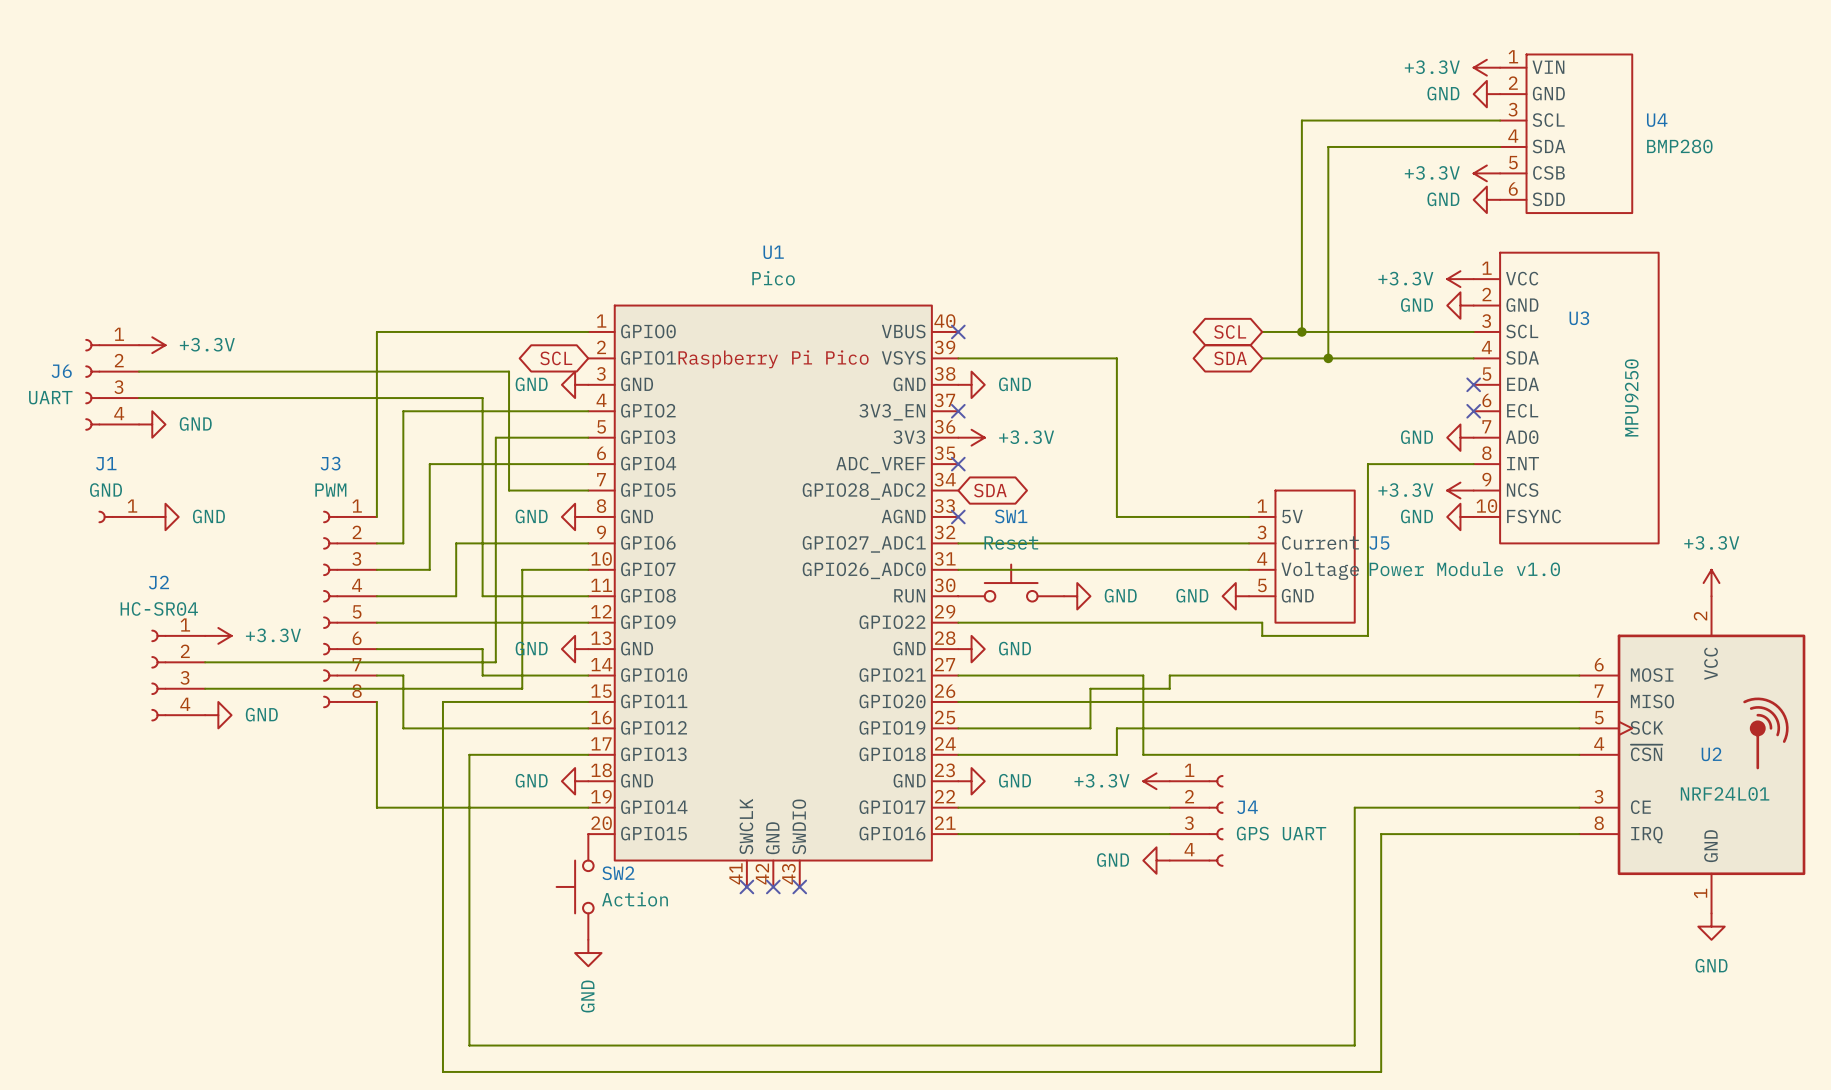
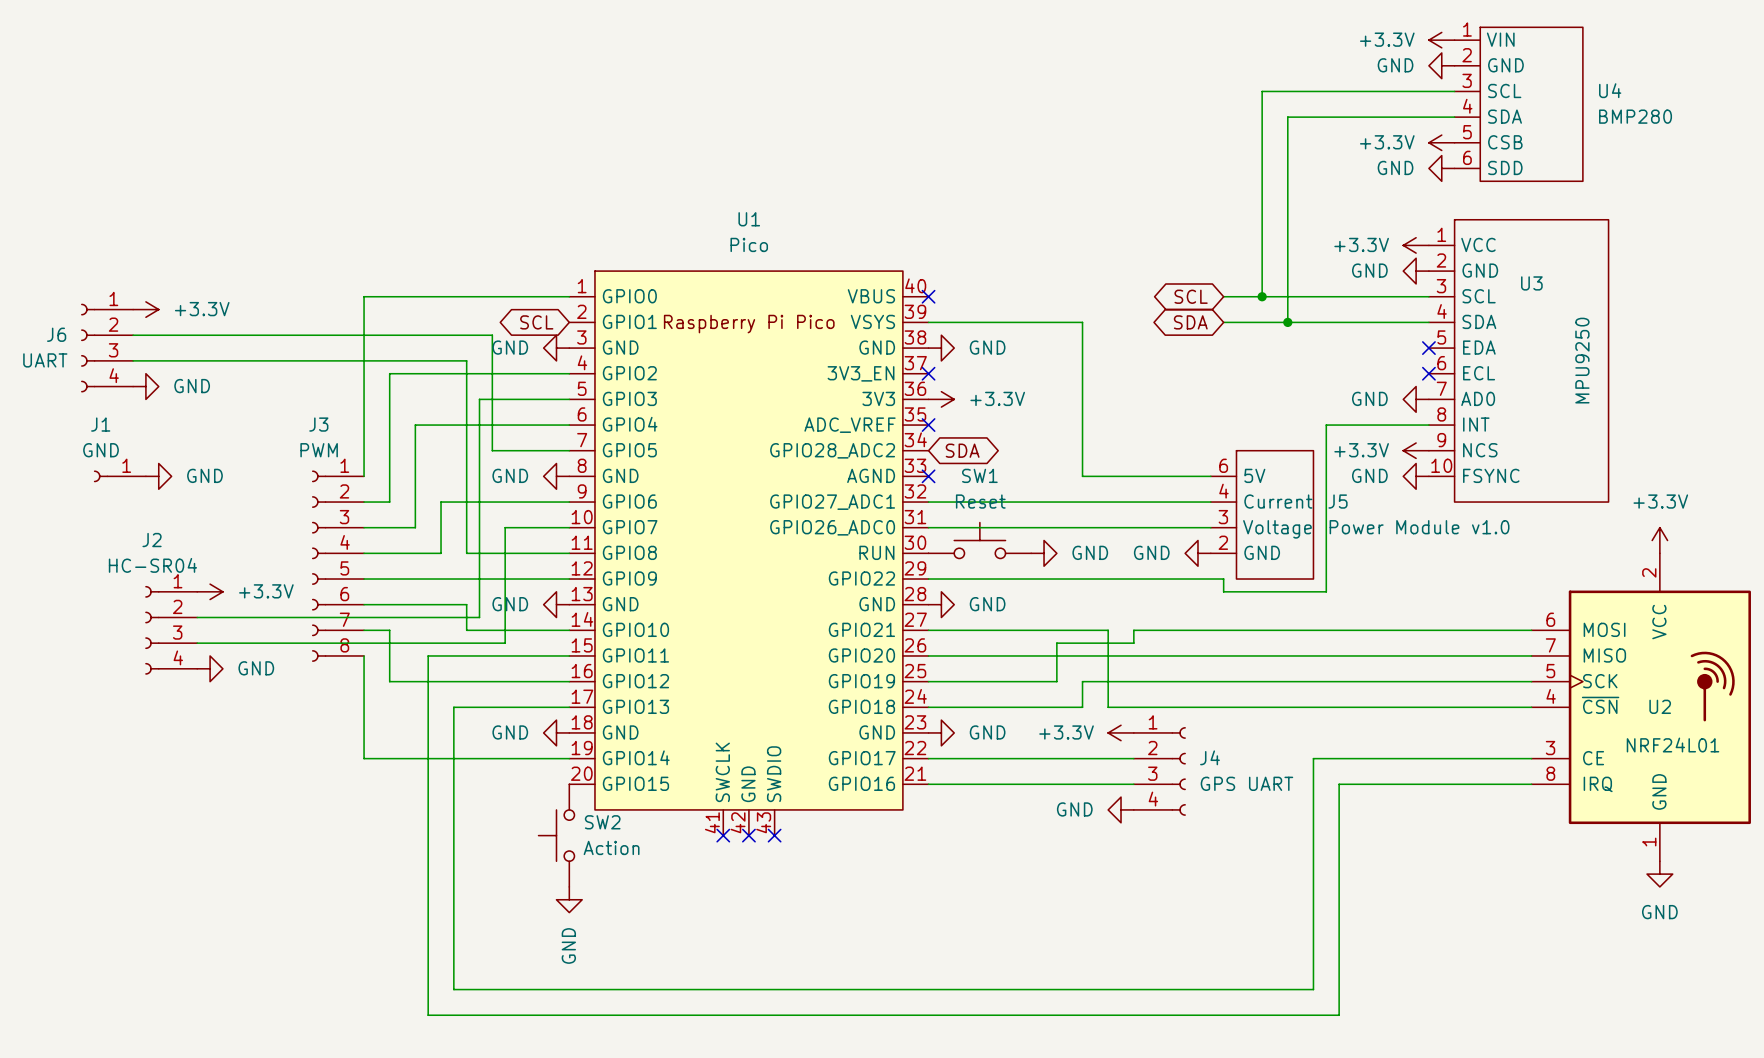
J5 pin number: 1 (1262, 506) -> 6 (1223, 465)
J5 pin number: 3 (1261, 532) -> 4 (1223, 491)
J5 pin number: 4 (1262, 558) -> 3 (1223, 517)
J5 pin number: 5 (1262, 585) -> 2 (1223, 542)

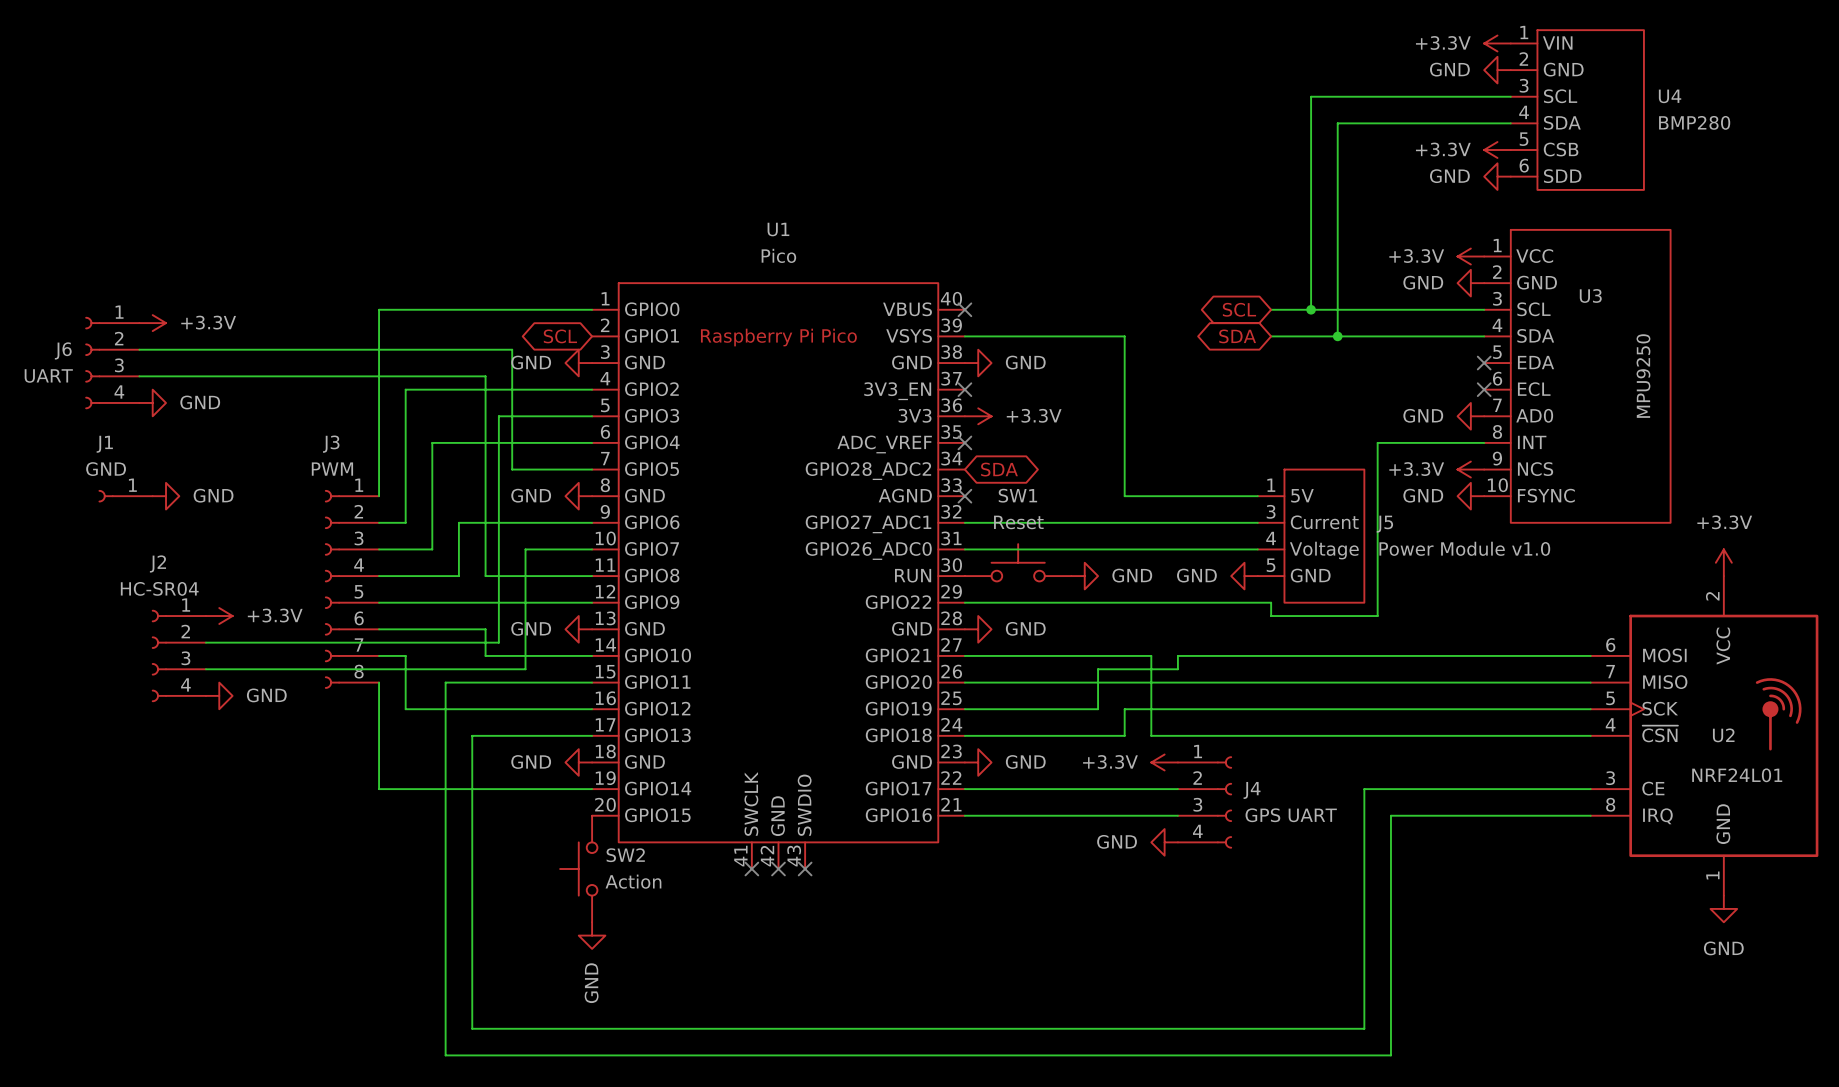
J5 pin number: 6 (1223, 465) -> 1 (1271, 485)
J5 pin number: 4 (1223, 491) -> 3 (1271, 511)
J5 pin number: 3 (1223, 517) -> 4 (1271, 538)
J5 pin number: 2 (1223, 542) -> 5 (1271, 565)

